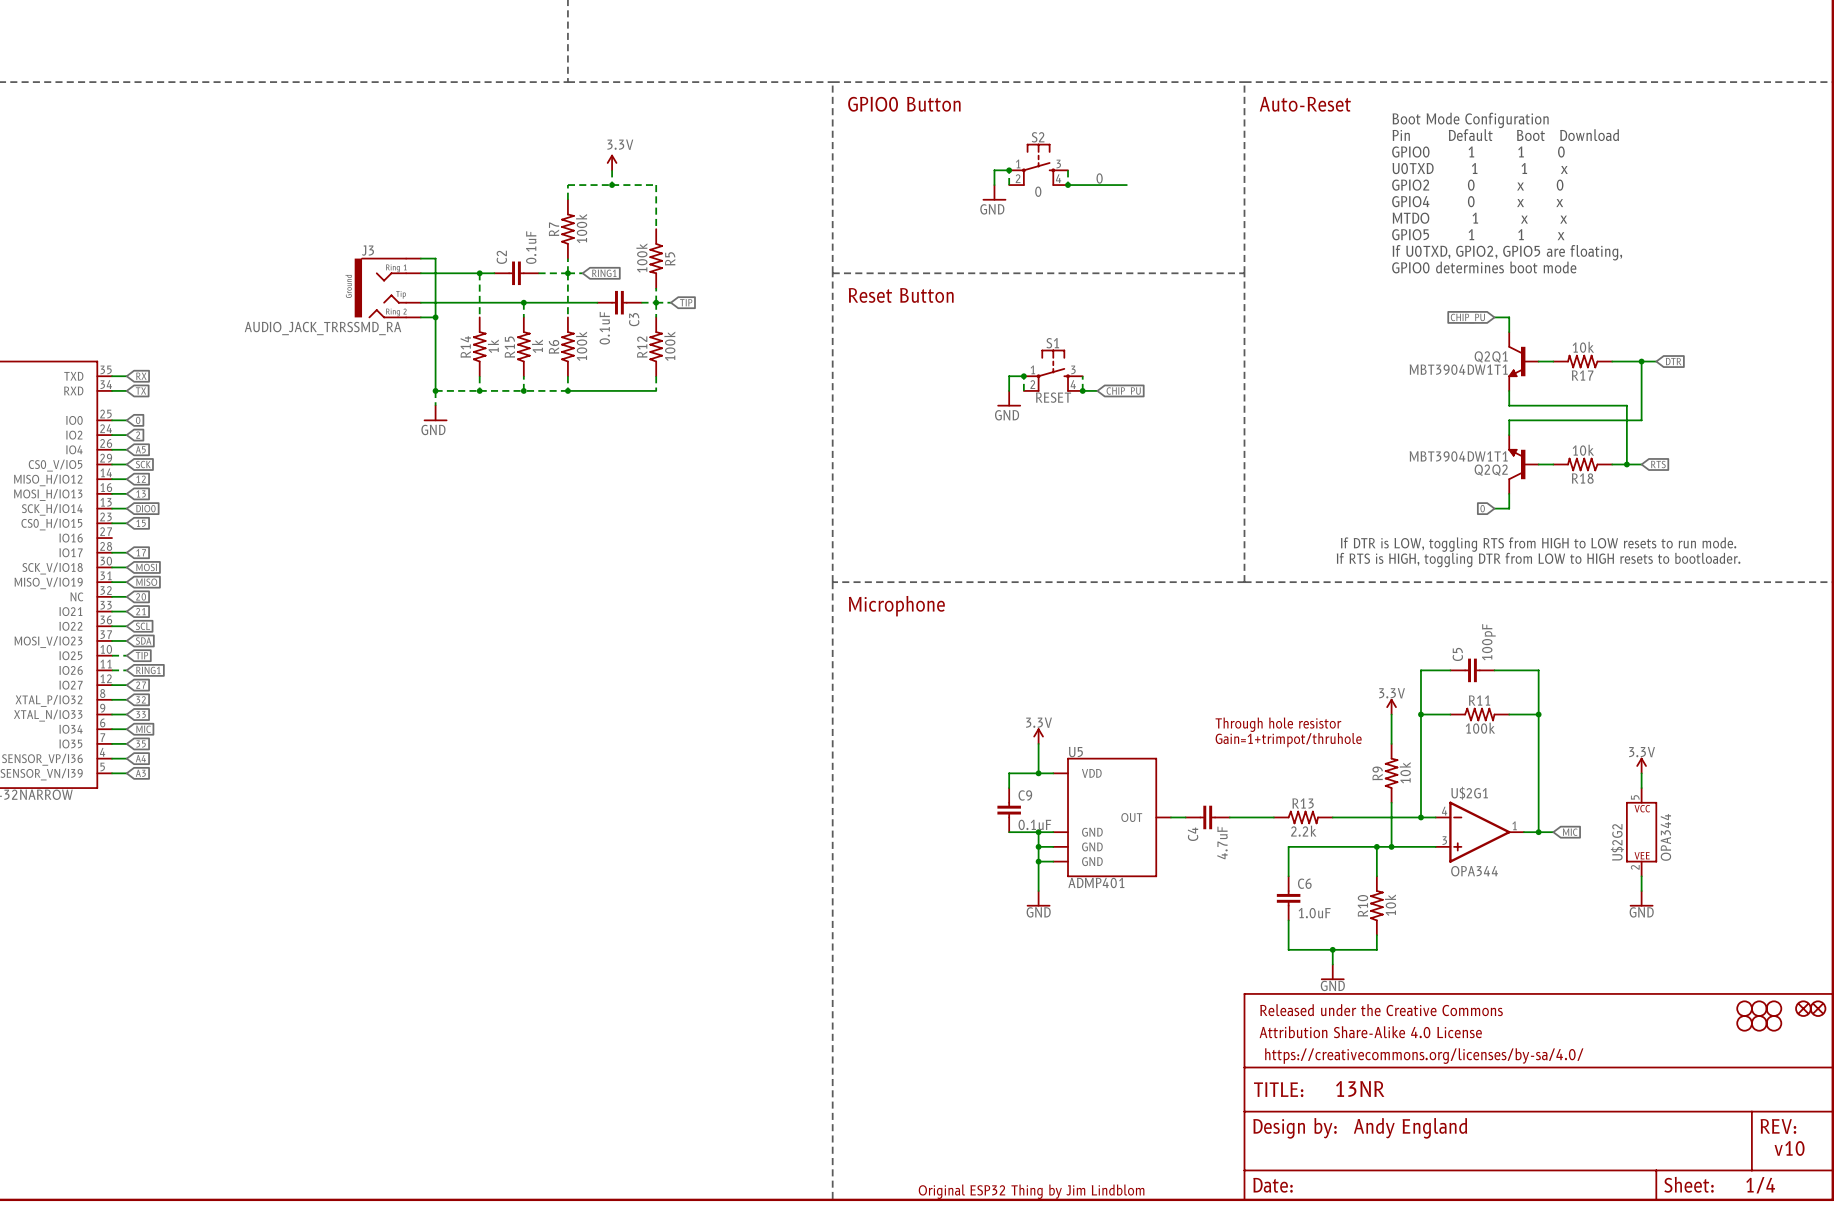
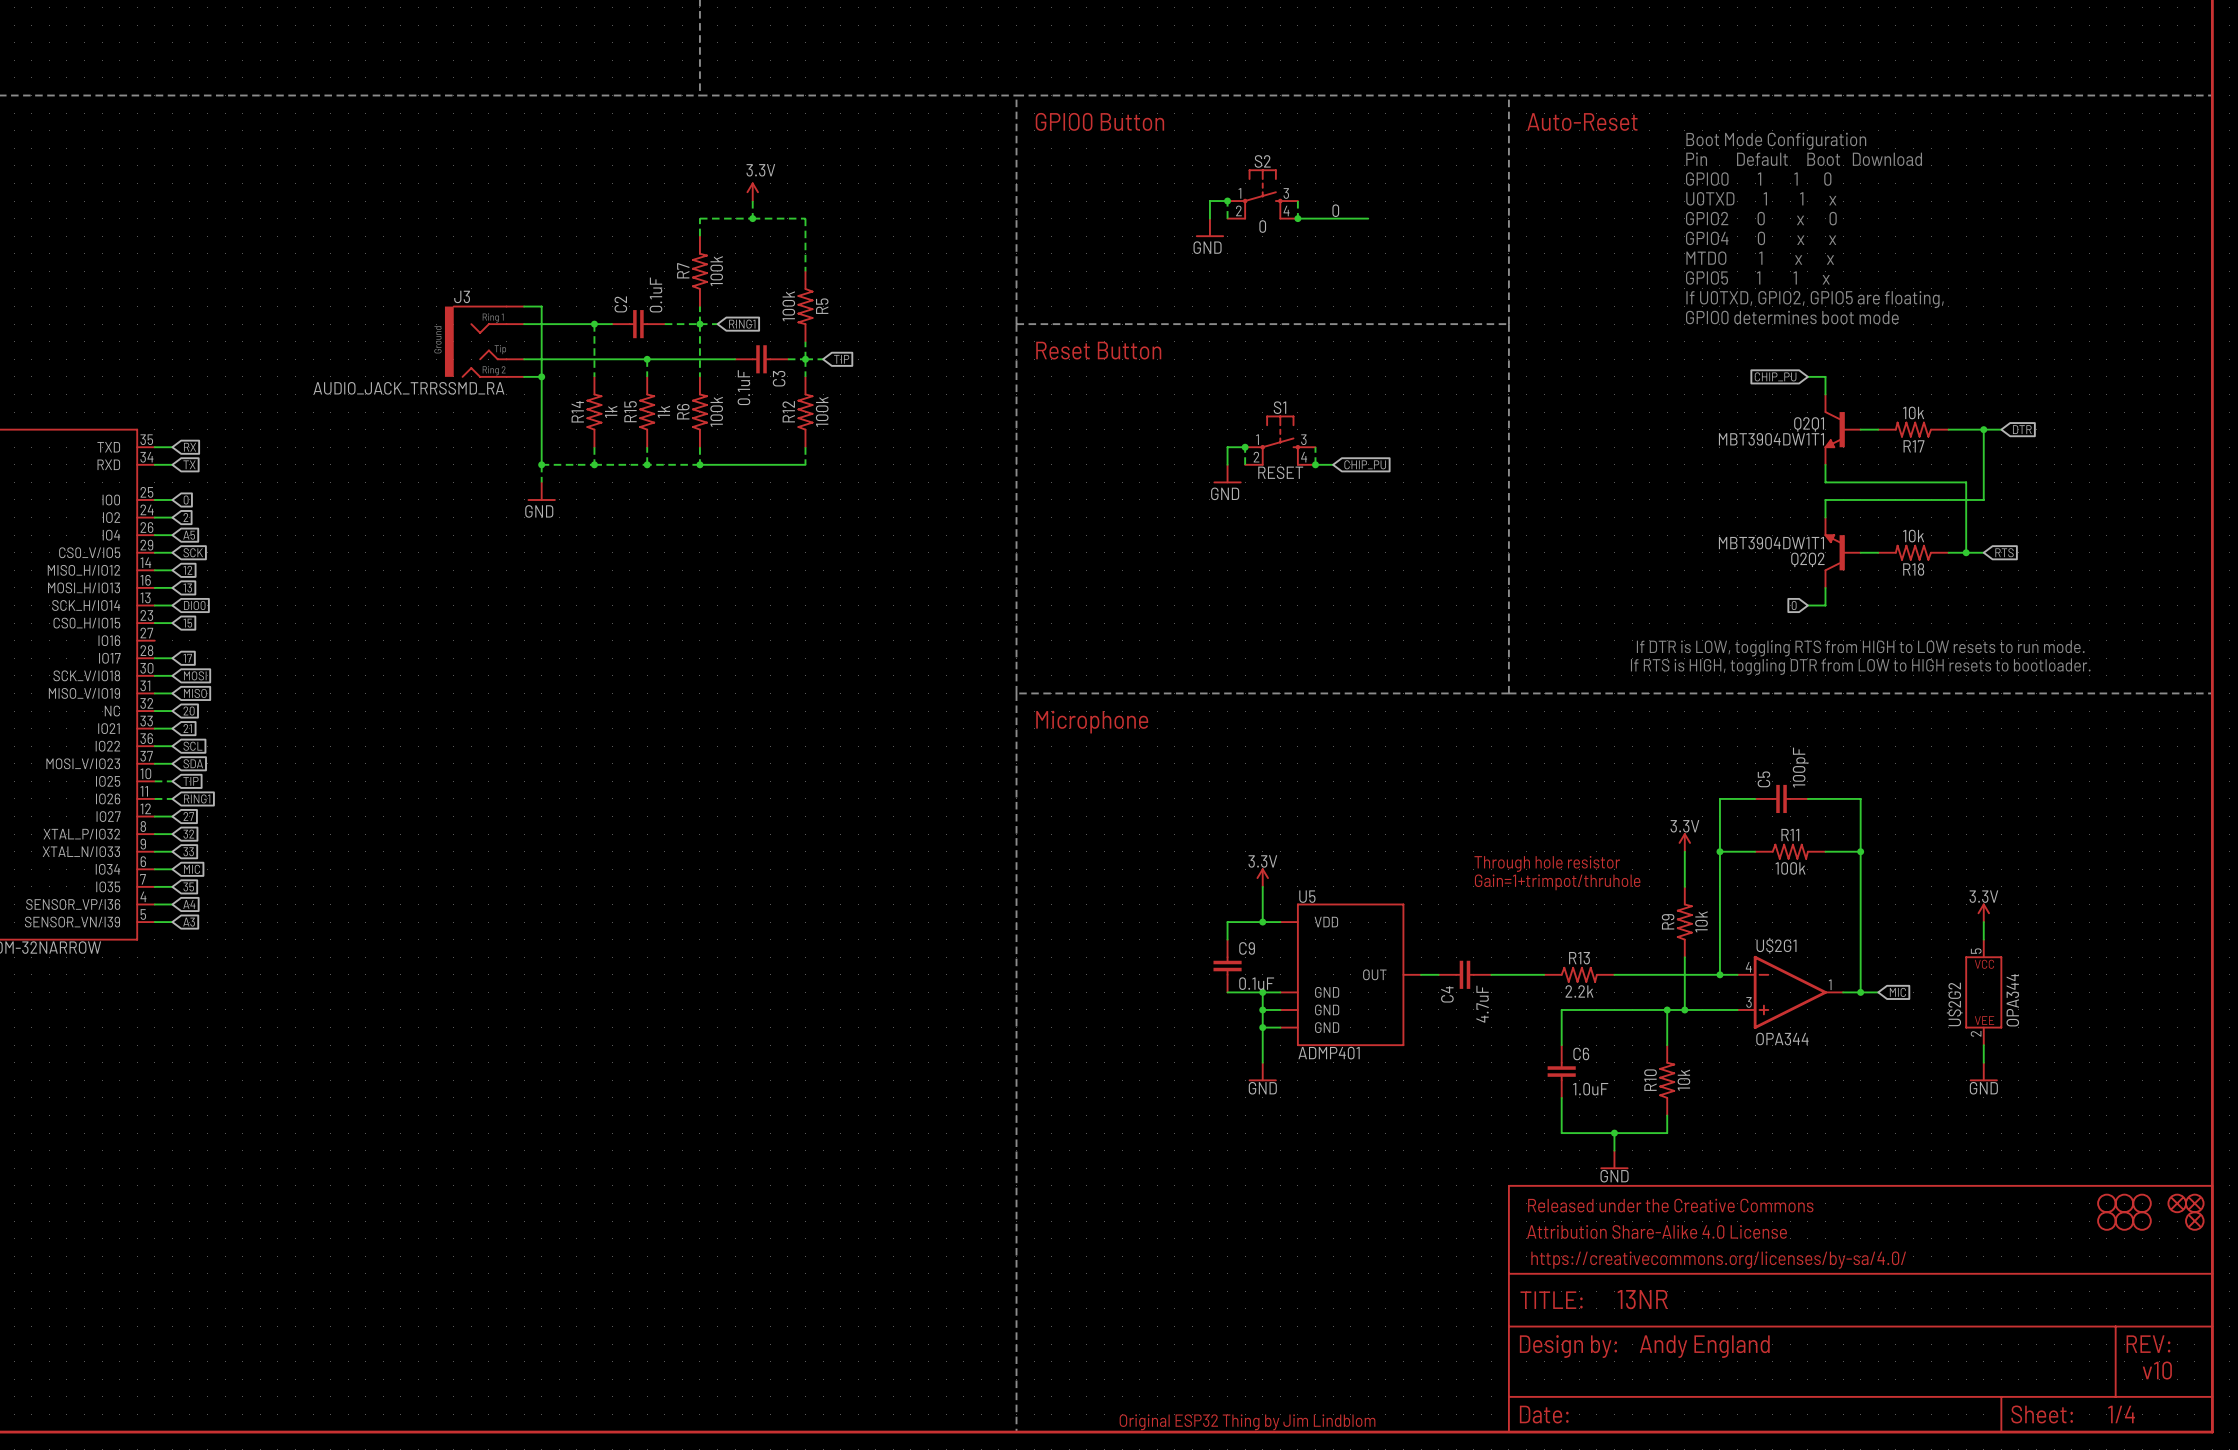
part: none -> (2194, 1221)

